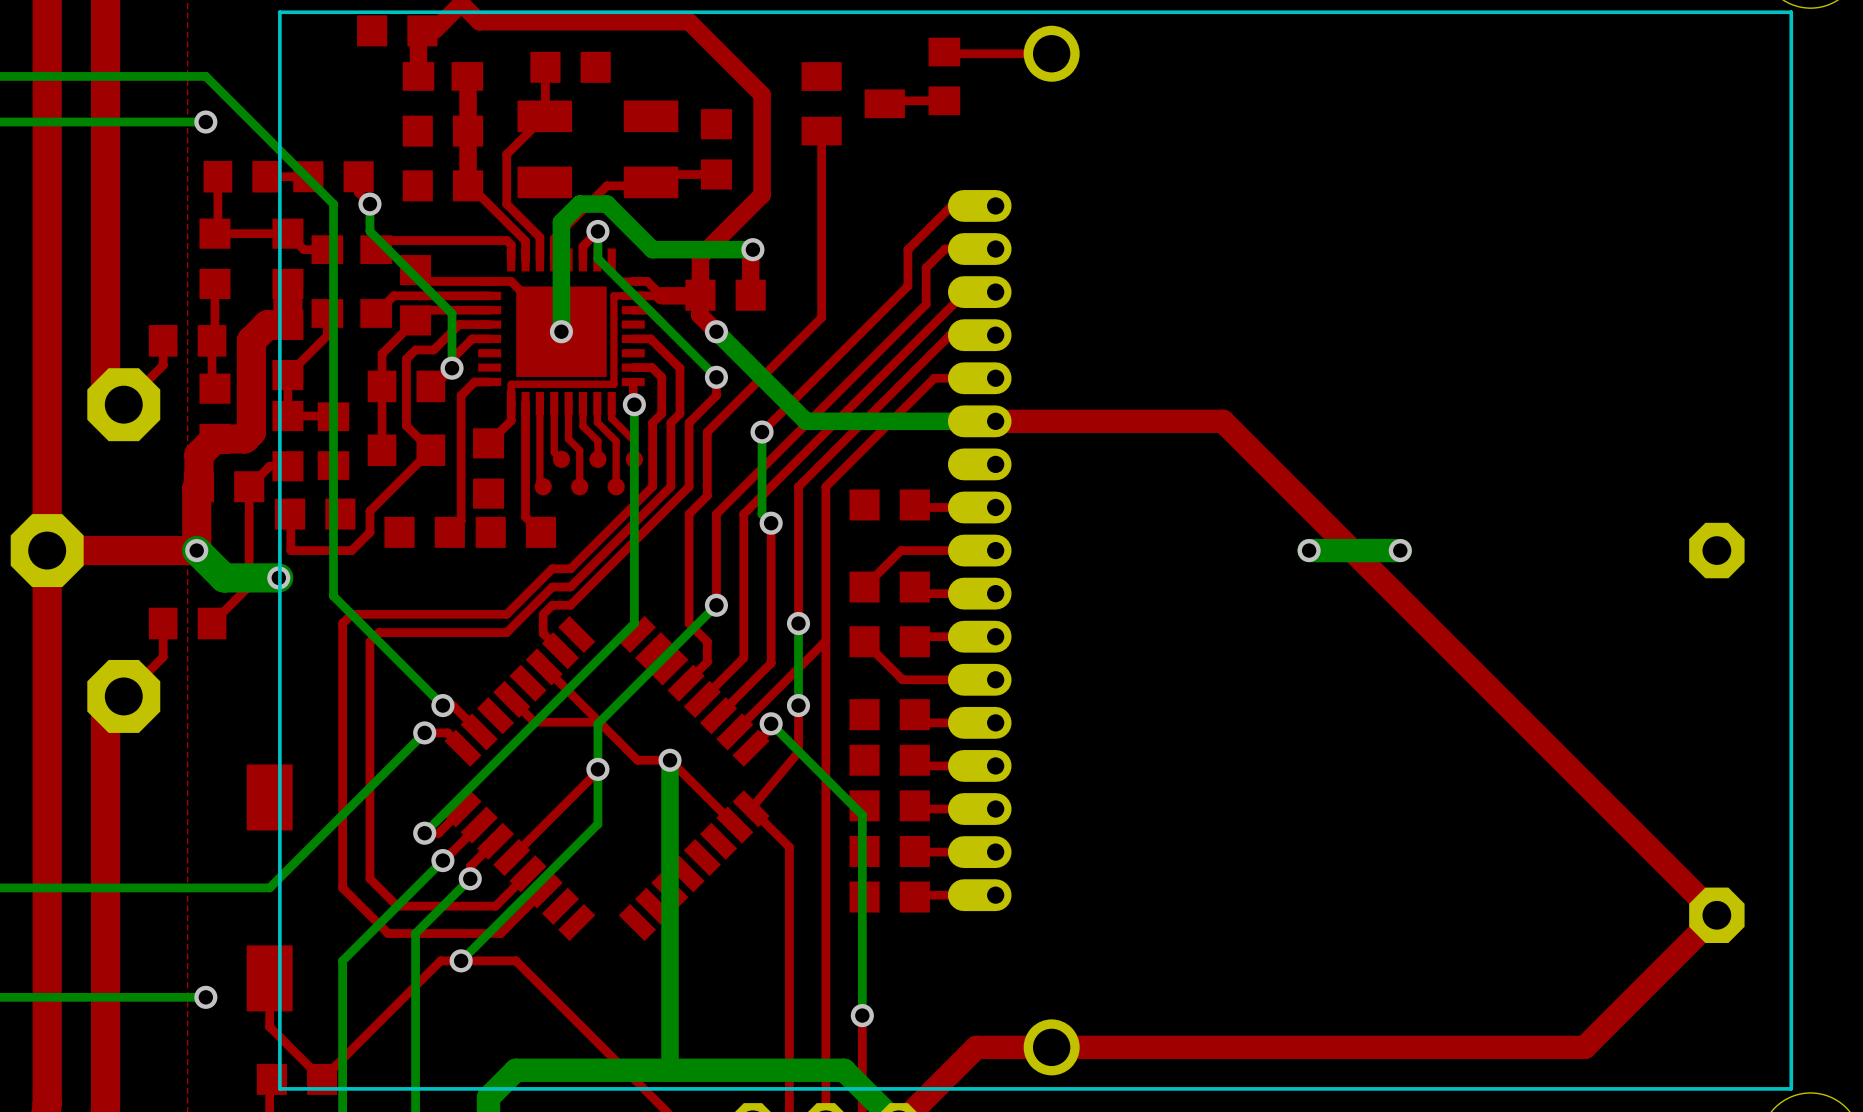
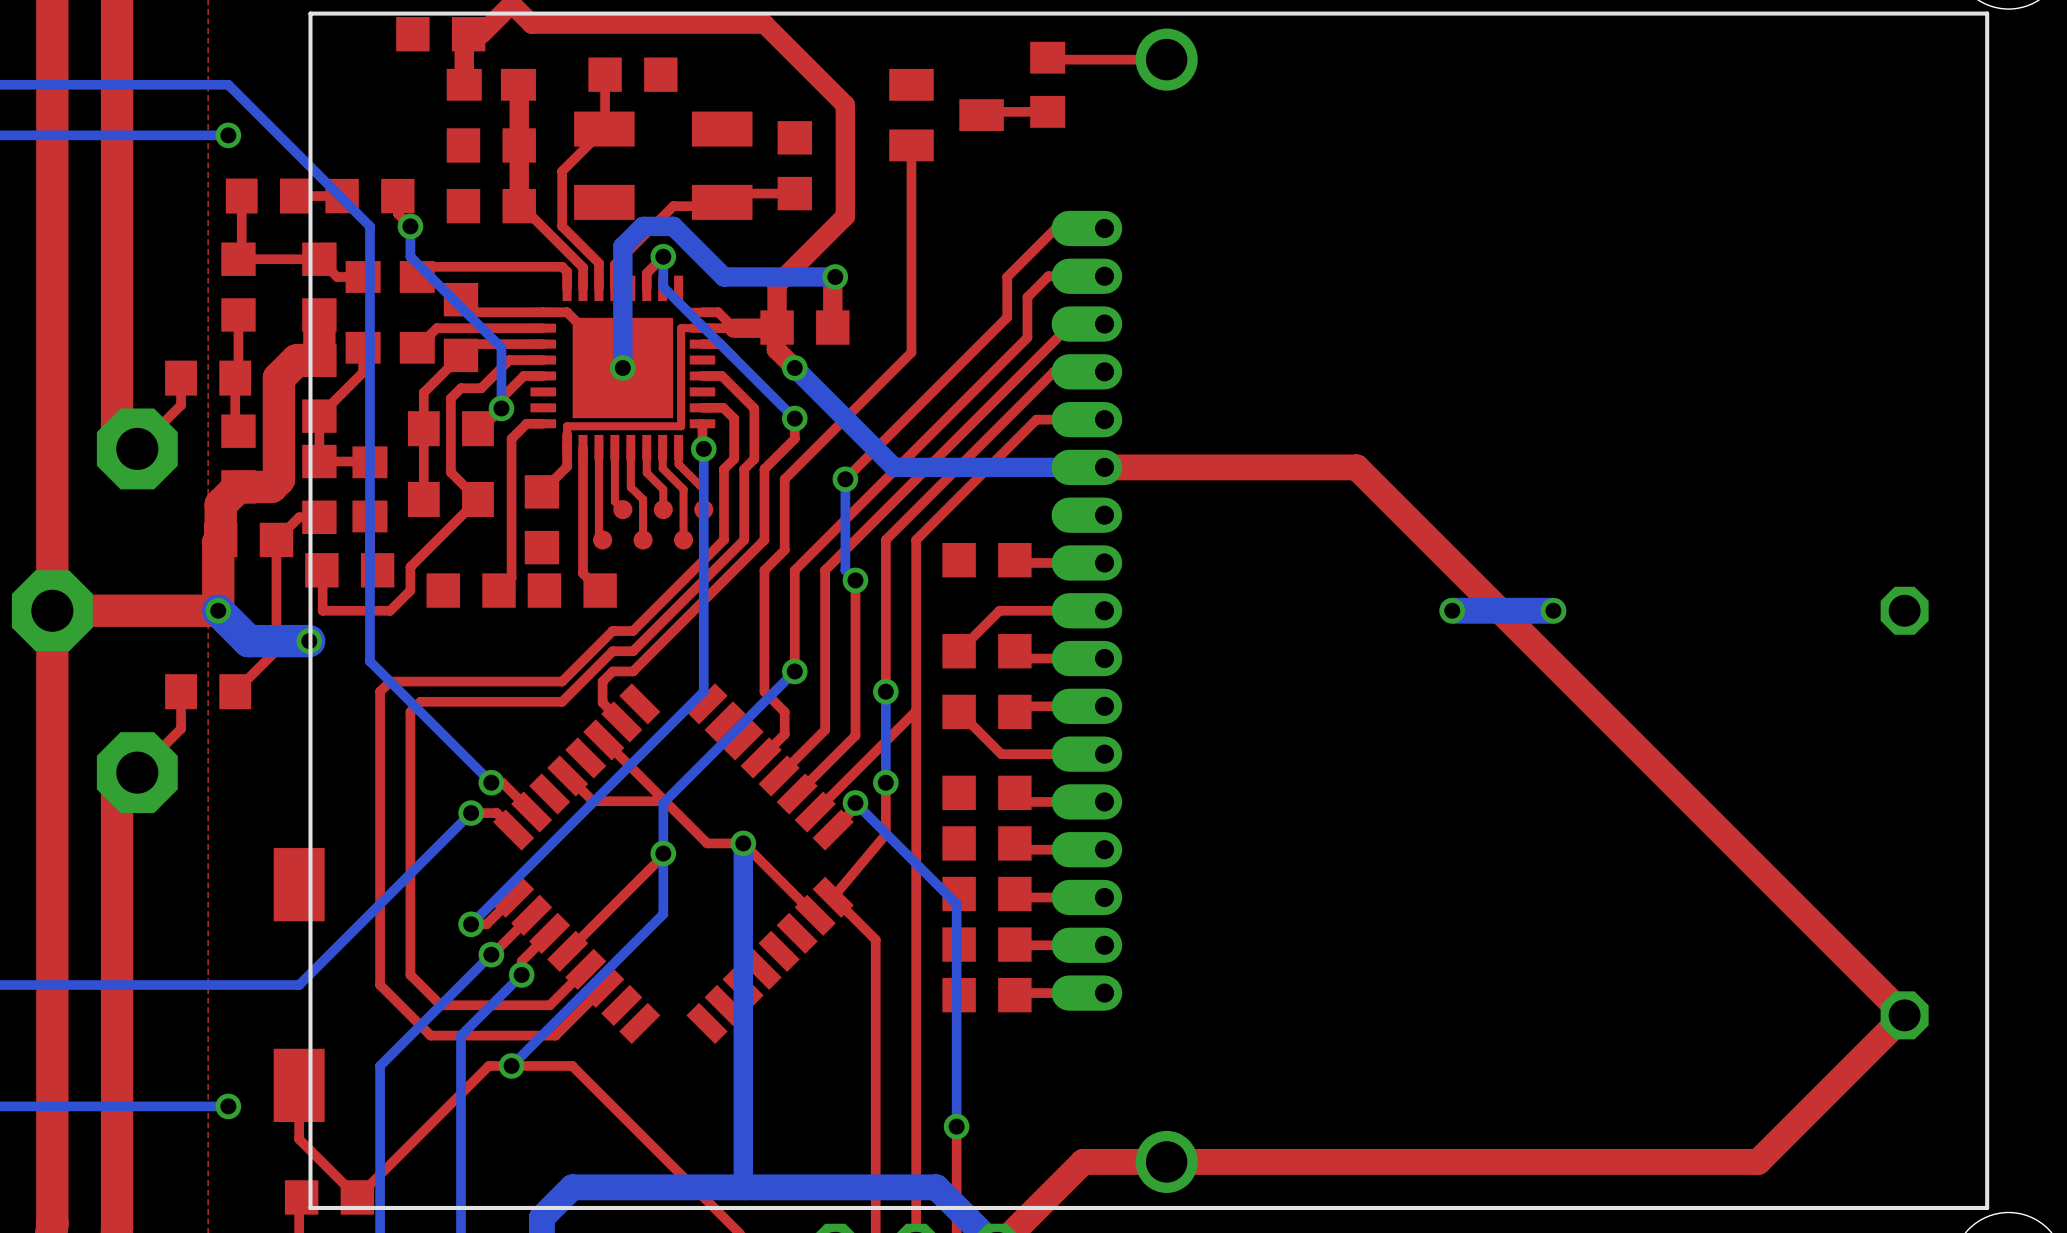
part footprint: [278, 10, 1794, 1091] -> [308, 11, 1990, 1210]

